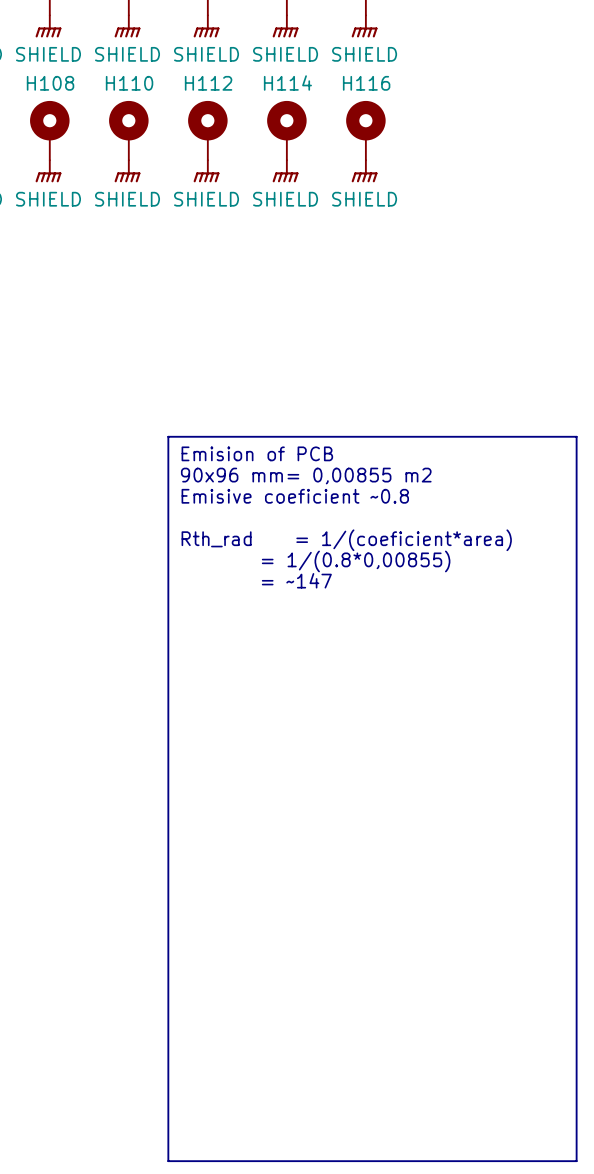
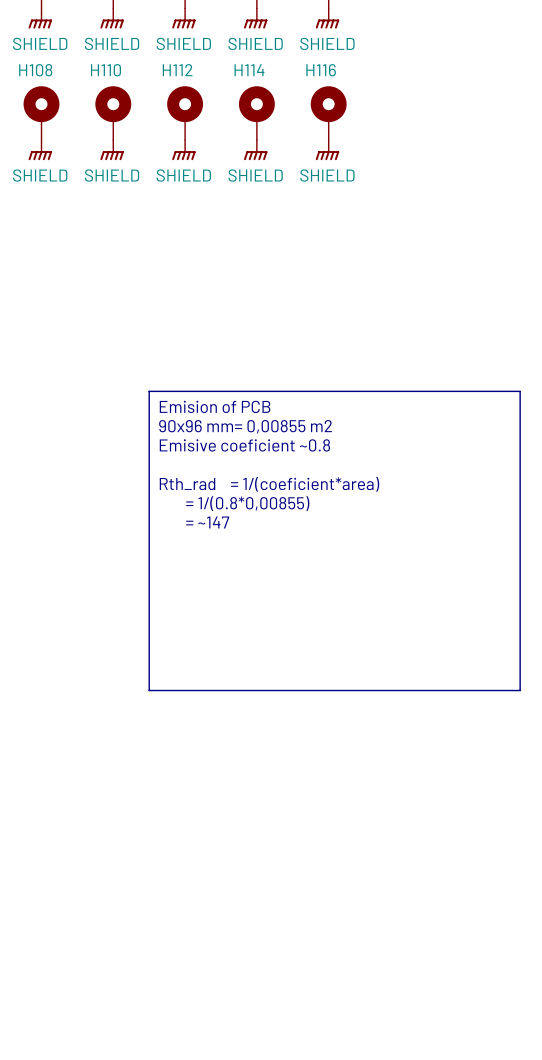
line: (168, 766) (168, 1161) (576, 1161) (576, 766) -> (149, 690) (520, 690)

